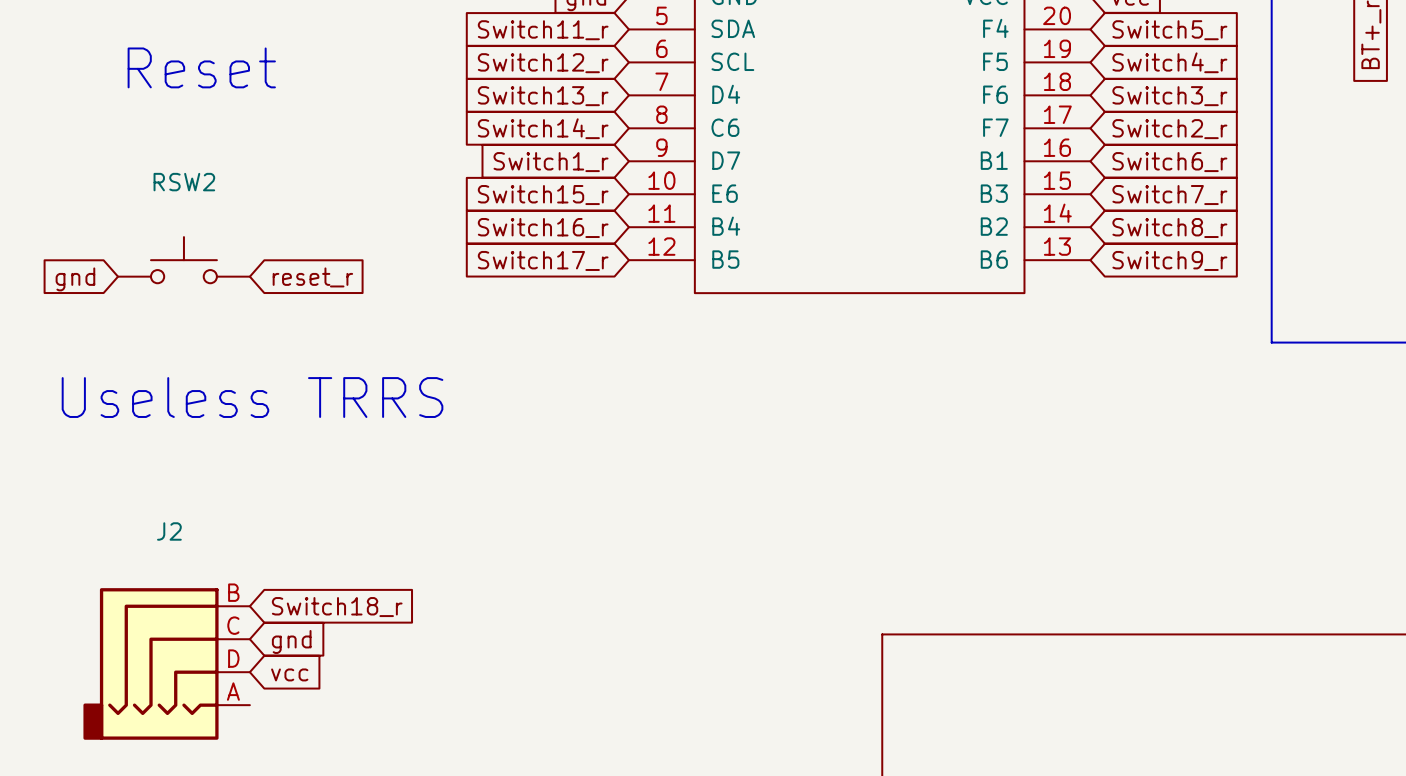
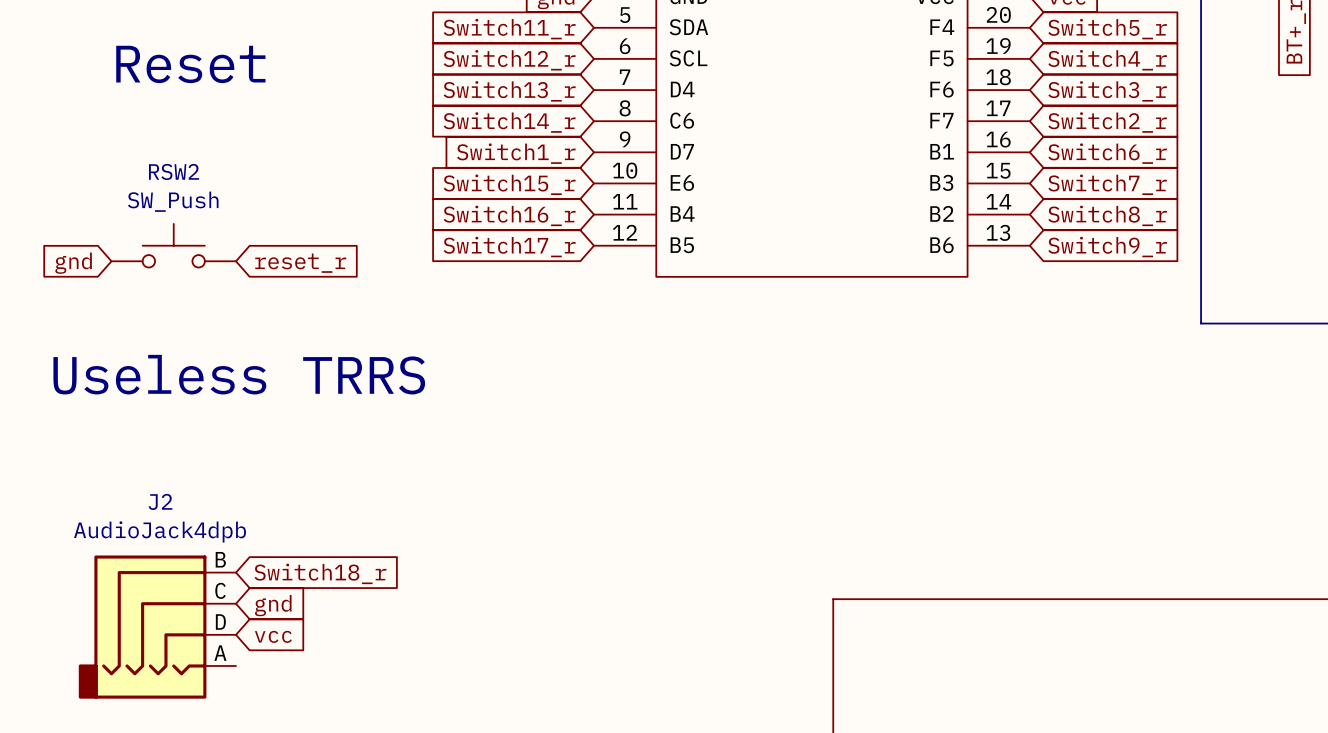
RSW2 value: none -> SW_Push (173, 201)
J2 value: none -> AudioJack4dpb (160, 531)

